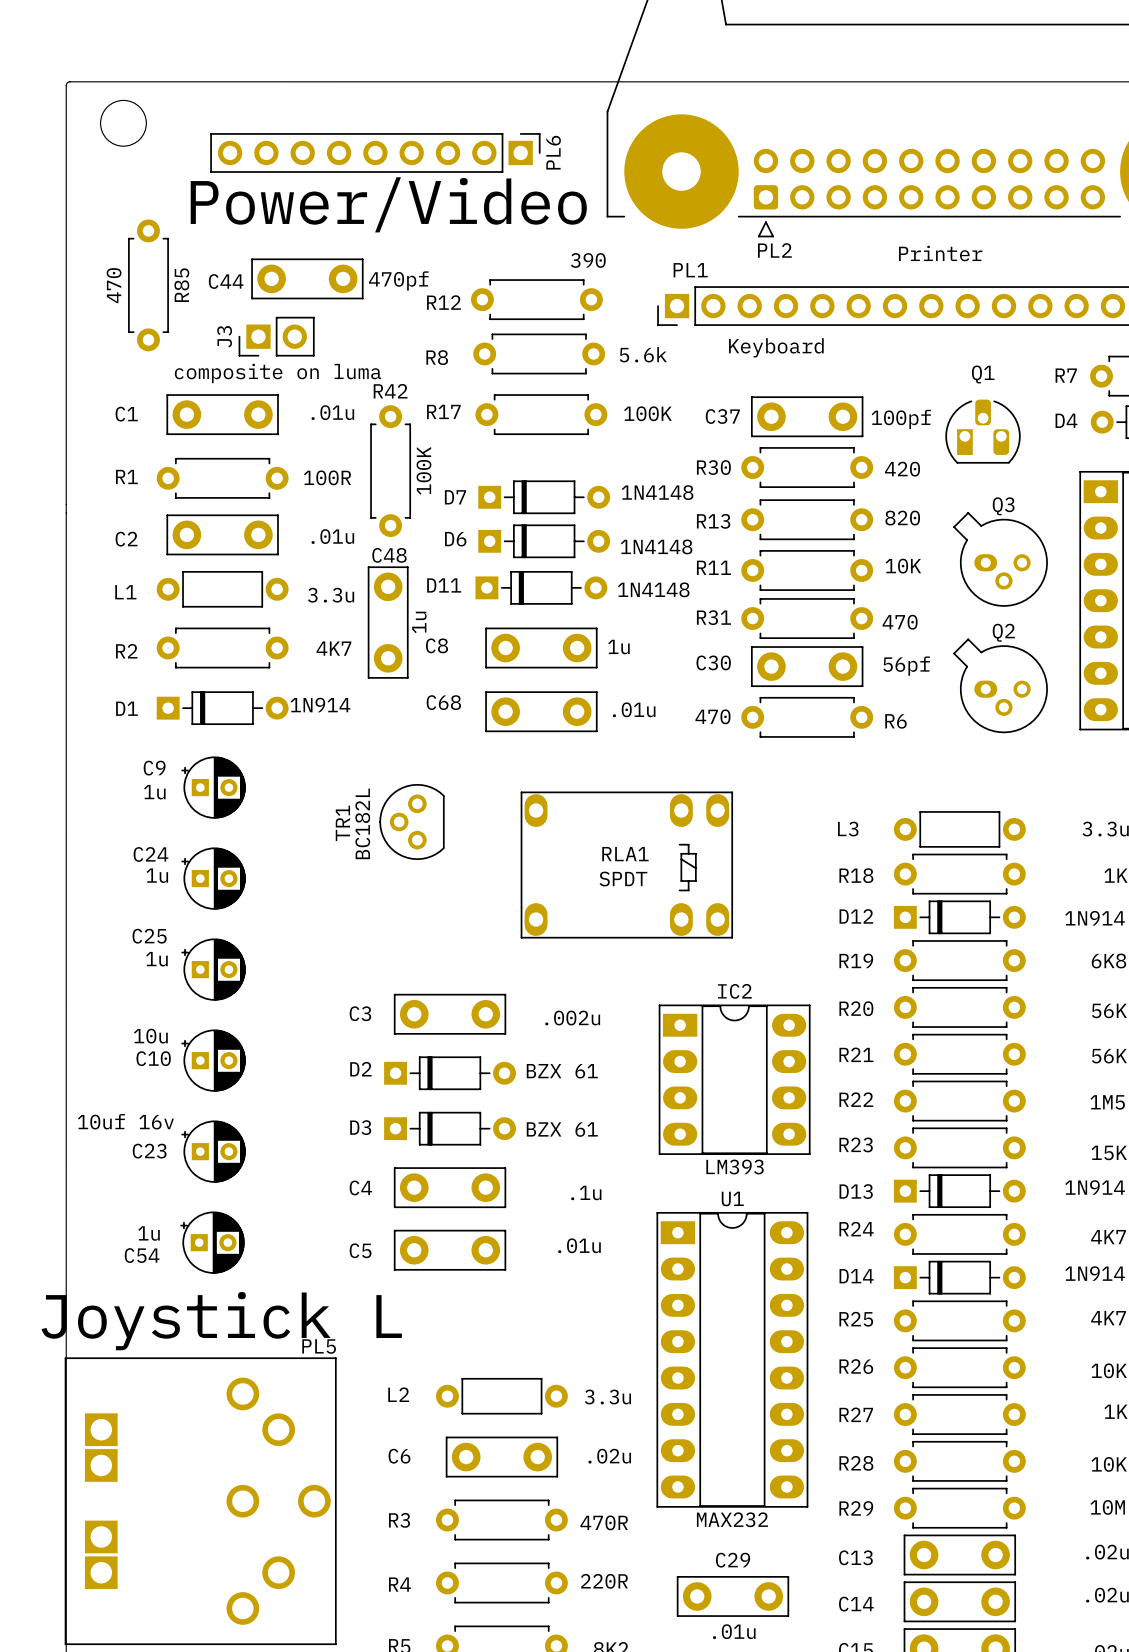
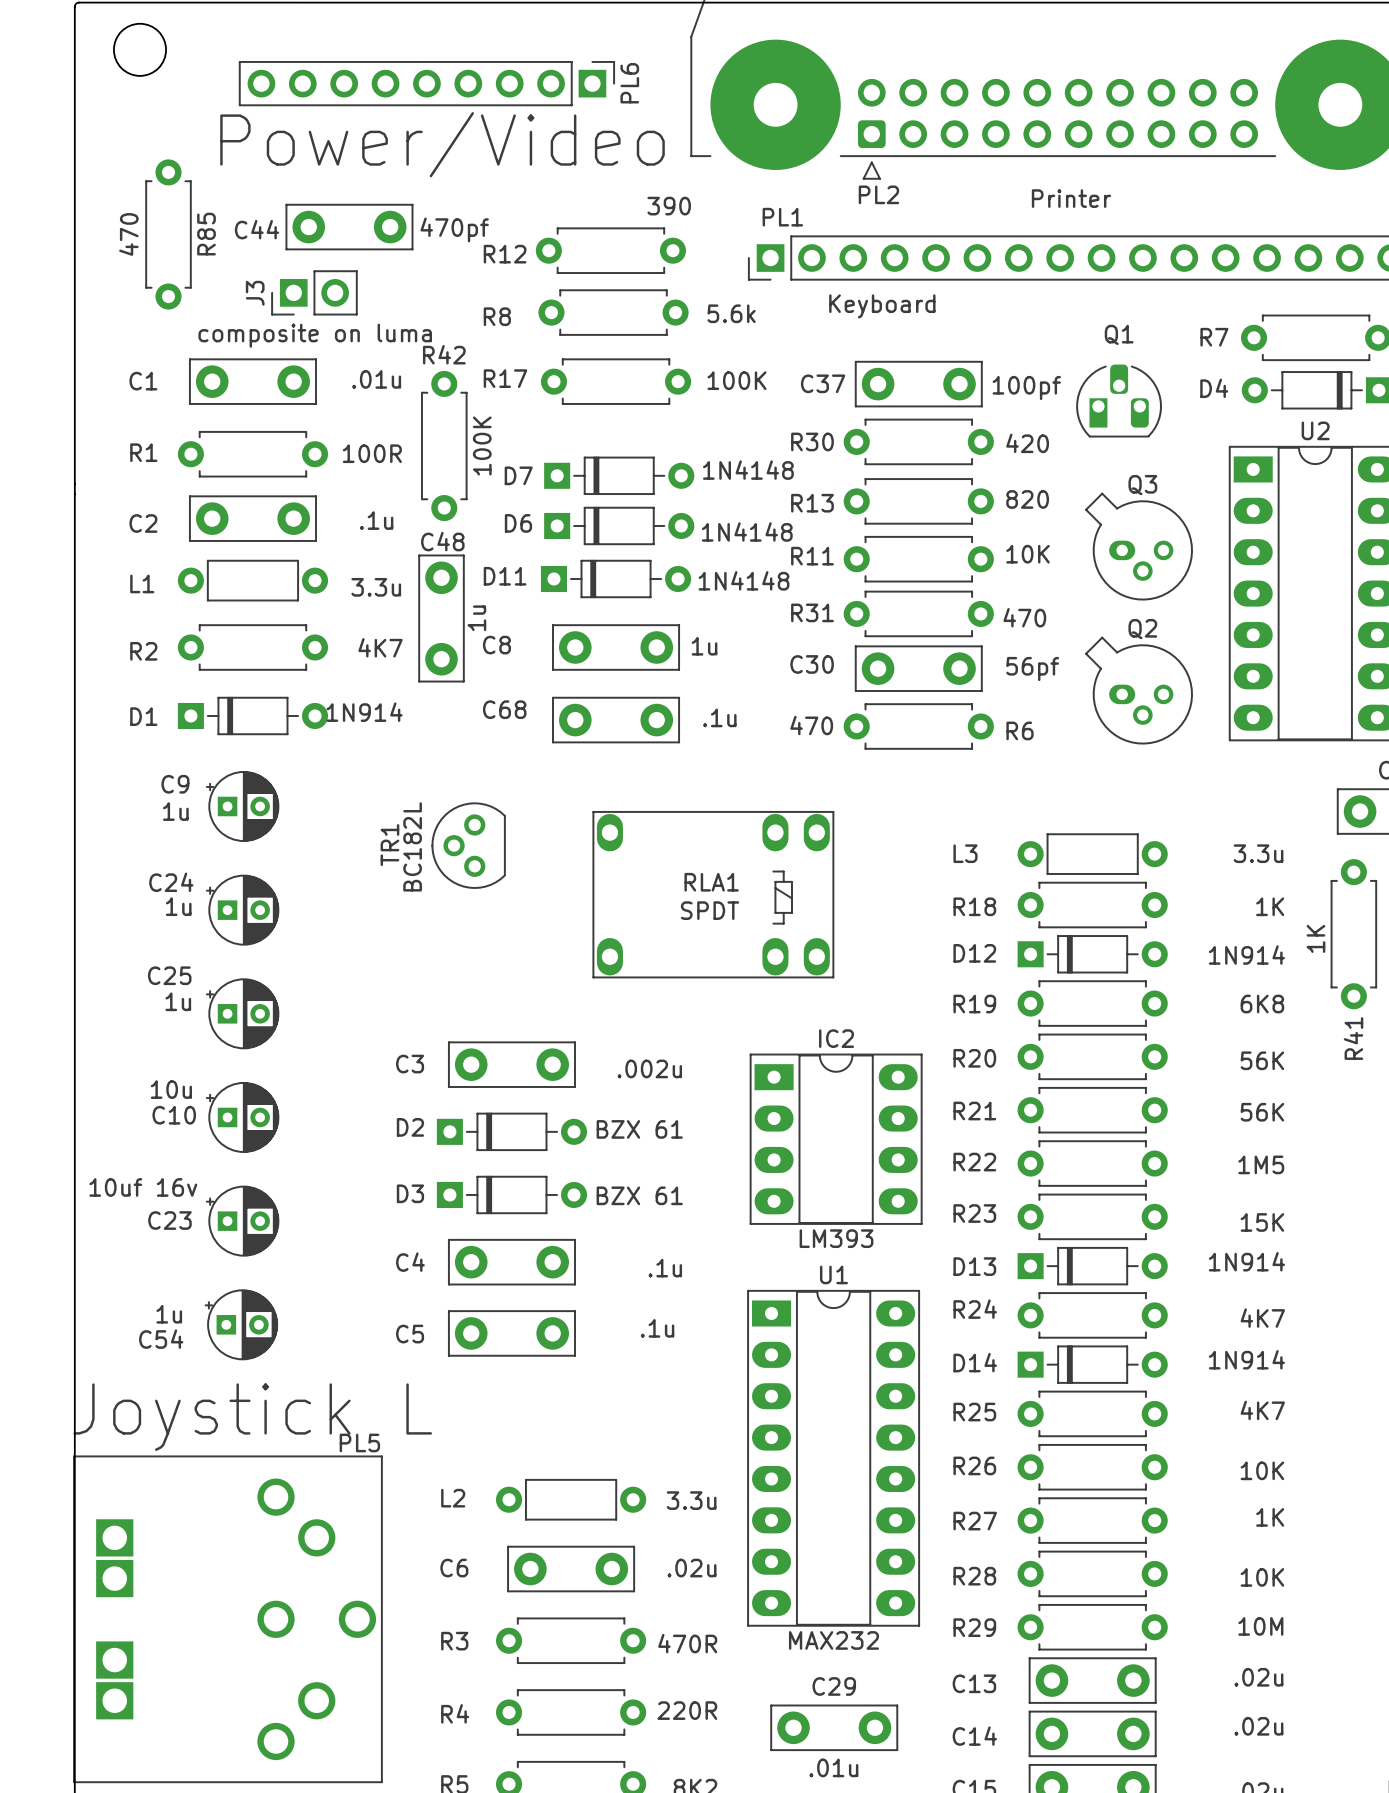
C2 value: .01u (332, 536) -> .1u (376, 520)
C68 value: .01u (634, 709) -> .1u (719, 717)
C5 value: .01u (579, 1245) -> .1u (657, 1328)

